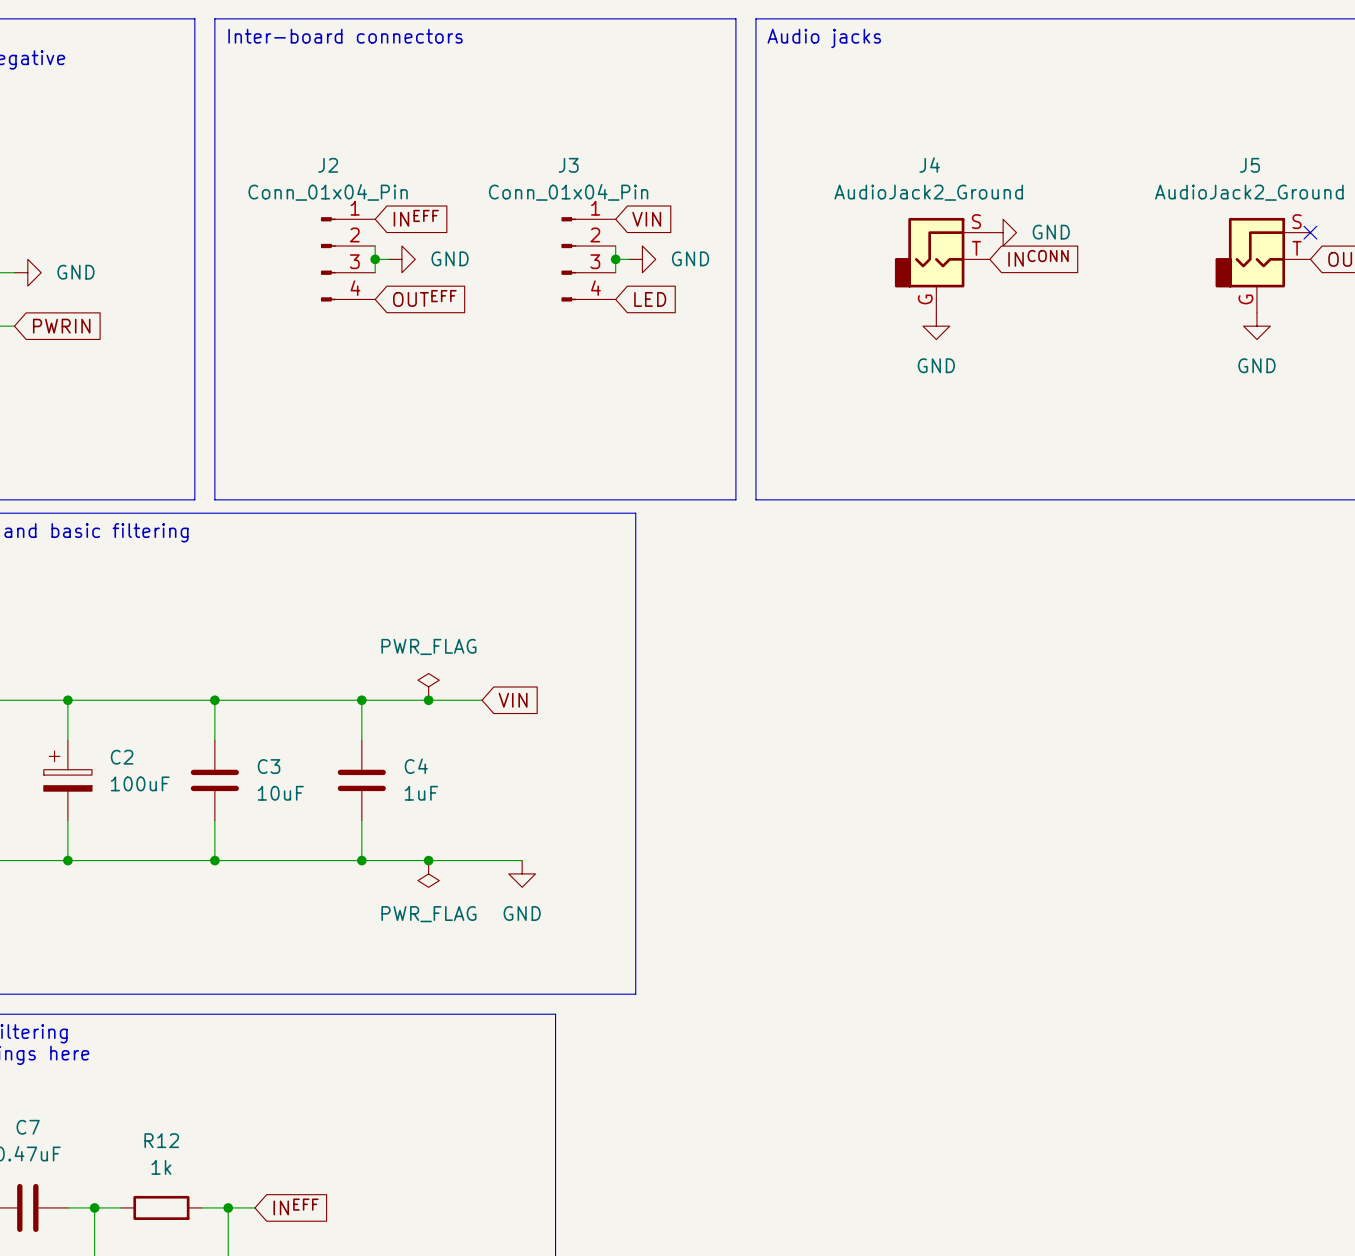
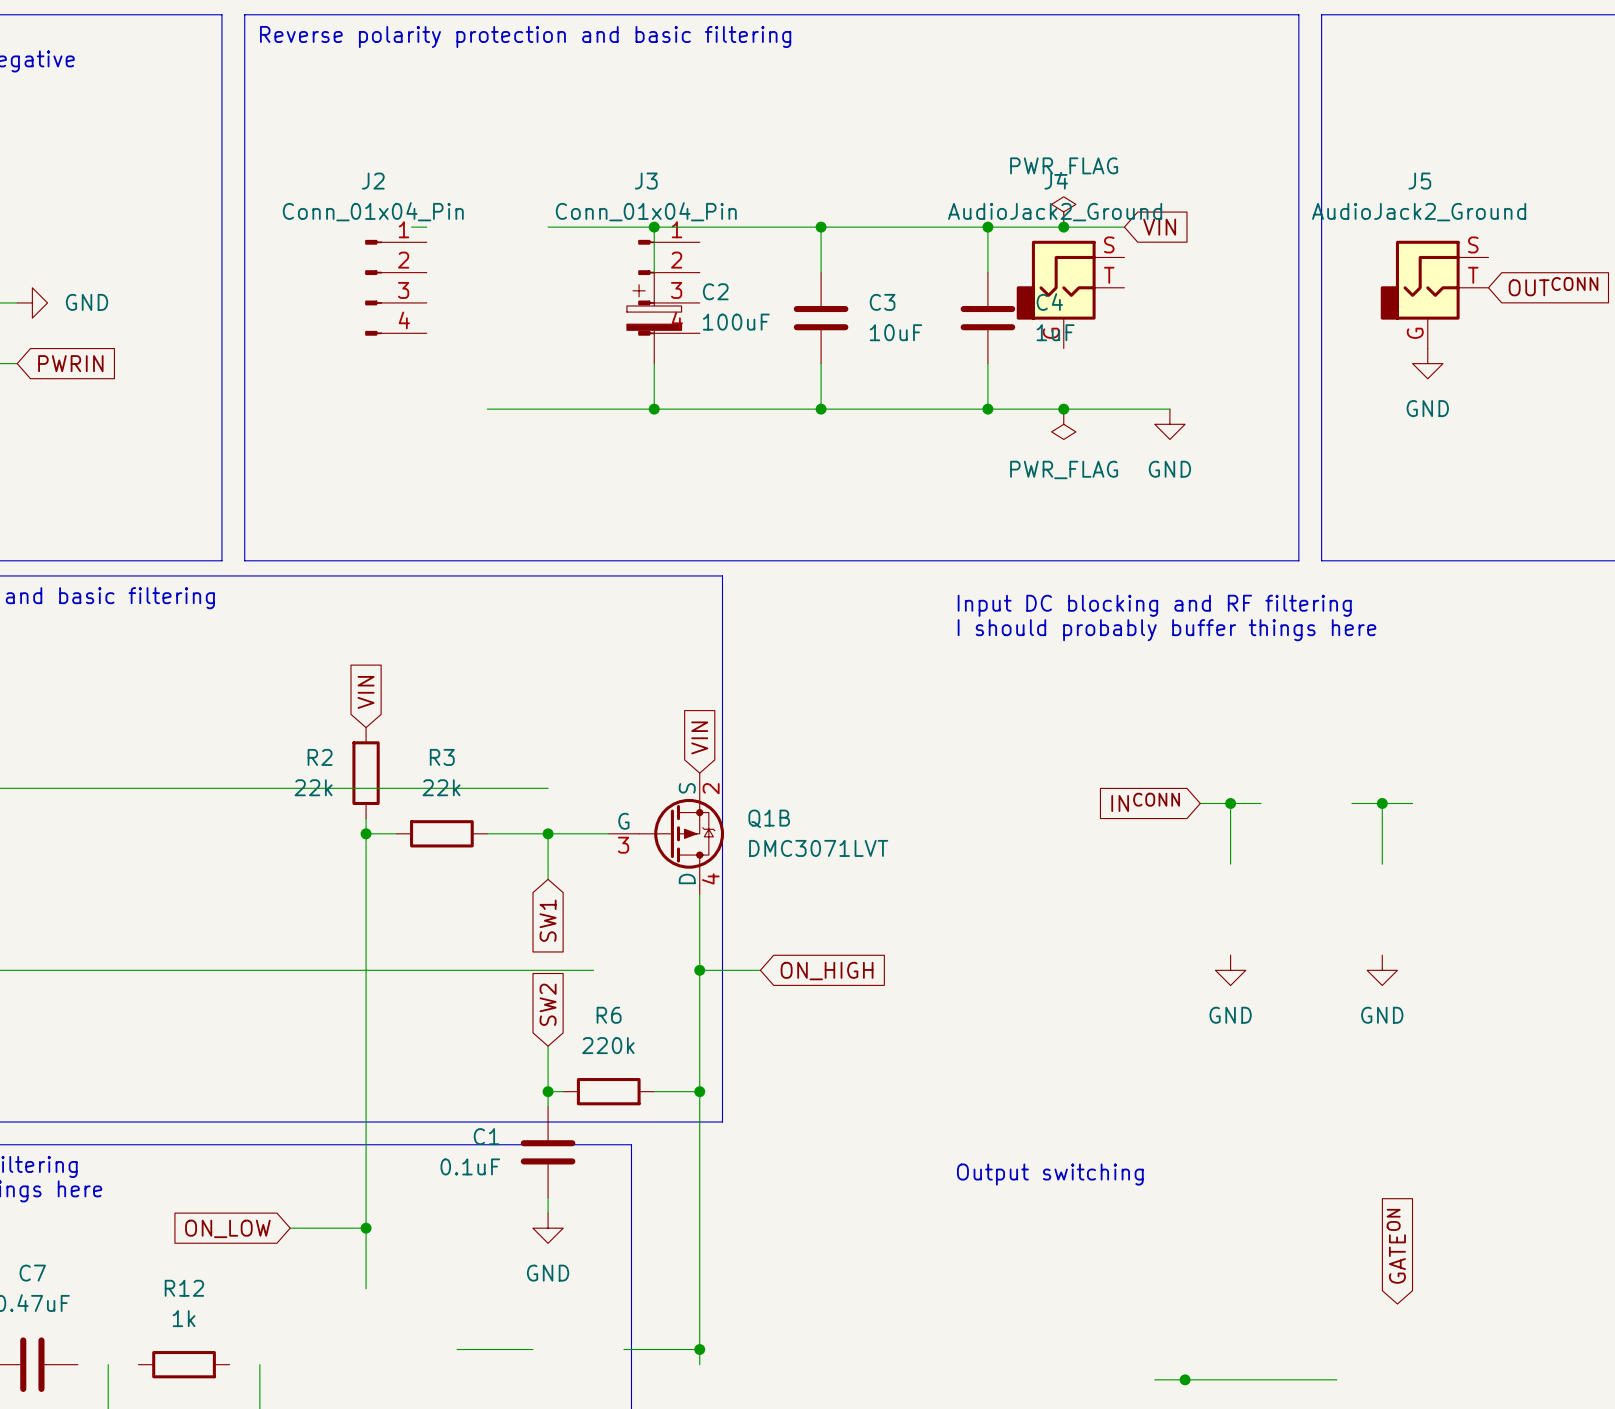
line: (735, 18) (735, 499) -> (836, 14) (859, 14)
line: (755, 18) (755, 499) -> (836, 560) (859, 560)
line: (1143, 18) (1163, 18) -> (1298, 14) (1298, 560)
text: Inter-board connectors (345, 36) -> Reverse polarity protection and basic filtering (525, 36)
text: Audio jacks (824, 38) -> none
power symbol: none -> PWR_FLAG (1063, 211)
wire: none -> (548, 227) (1124, 227)
wire: none -> (654, 227) (654, 272)
junction: none -> (654, 227)
wire: none -> (821, 227) (821, 272)
junction: none -> (821, 227)
wire: none -> (987, 227) (987, 272)
junction: none -> (987, 227)
junction: none -> (1063, 227)
global label: none -> VIN (1159, 227)
global label: INEFF (416, 218) -> none
global label: VIN (646, 219) -> none
power symbol: GND (1003, 232) -> none
no-connect mark: (1310, 232) -> none
wire: (375, 246) (375, 272) -> none
wire: (615, 246) (615, 272) -> none
global label: INCONN (1038, 258) -> none
wire: (375, 259) (388, 259) -> (411, 227) (426, 227)
junction: (375, 259) -> none
power symbol: GND (401, 259) -> none
wire: (615, 259) (629, 259) -> none
junction: (615, 259) -> none
power symbol: GND (642, 259) -> none
global label: OUTEFF (424, 298) -> none
global label: LED (650, 299) -> none
wire: none -> (654, 363) (654, 409)
wire: none -> (821, 363) (821, 409)
wire: none -> (987, 363) (987, 409)
power symbol: GND (936, 326) -> none
wire: none -> (487, 409) (1169, 409)
junction: none -> (654, 409)
junction: none -> (821, 409)
junction: none -> (987, 409)
junction: none -> (1063, 409)
power symbol: none -> PWR_FLAG (1063, 424)
power symbol: none -> GND (1169, 424)
line: (1143, 499) (1163, 499) -> (1321, 14) (1321, 560)
text: none -> Input DC blocking and RF filtering (1154, 605)
text: none -> I should probably buffer things here (1166, 630)
global label: none -> VIN (366, 692)
global label: none -> VIN (699, 737)
R2: none -> 22k (366, 773)
power symbol: PWR_FLAG (428, 686) -> none
wire: (67, 700) (67, 740) -> none
junction: (67, 700) -> none
wire: (214, 700) (214, 740) -> none
junction: (214, 700) -> none
wire: (361, 700) (361, 740) -> (548, 833) (548, 879)
junction position: (361, 700) -> (366, 833)
junction: (428, 700) -> none
global label: VIN (513, 700) -> none
global label: none -> INCONN (1145, 802)
wire: none -> (1200, 803) (1260, 803)
wire: none -> (1230, 803) (1230, 864)
junction: none -> (1230, 803)
wire: none -> (1351, 803) (1412, 803)
wire: none -> (1382, 803) (1382, 864)
junction: none -> (1382, 803)
wire: none -> (366, 818) (366, 1288)
wire: none -> (366, 833) (396, 833)
R3: none -> 22k (441, 833)
wire: none -> (487, 833) (608, 833)
junction: none -> (548, 833)
Q1B: none -> DMC3071LVT (666, 833)
C2 position: (67, 780) -> (654, 318)
C3 position: (214, 780) -> (821, 318)
C4 position: (361, 780) -> (987, 318)
wire: none -> (699, 894) (699, 1364)
global label: none -> SW1 (548, 920)
wire: (67, 820) (67, 860) -> none
wire: (214, 820) (214, 860) -> none
wire: (361, 820) (361, 860) -> none
junction: (67, 860) -> none
junction: (214, 860) -> none
junction: (361, 860) -> none
junction: (428, 860) -> none
wire: none -> (699, 970) (760, 970)
junction: none -> (699, 970)
power symbol: none -> GND (1230, 970)
power symbol: none -> GND (1382, 970)
global label: none -> ON_HIGH (827, 971)
power symbol: PWR_FLAG (428, 873) -> none
power symbol: GND (522, 873) -> none
global label: none -> SW2 (548, 1004)
wire: none -> (548, 1046) (548, 1106)
wire: none -> (548, 1091) (563, 1091)
junction: none -> (548, 1091)
R6: none -> 220k (608, 1091)
wire: none -> (654, 1091) (699, 1091)
junction: none -> (699, 1091)
C1: none -> 0.1uF (548, 1152)
text: none -> Output switching (1050, 1174)
wire: none -> (548, 1197) (548, 1213)
wire: none -> (290, 1228) (366, 1228)
junction: none -> (366, 1228)
power symbol: none -> GND (548, 1228)
global label: none -> ON_LOW (227, 1228)
global label: none -> GATEON (1396, 1246)
wire: none -> (457, 1349) (532, 1349)
wire: none -> (623, 1349) (699, 1349)
junction: none -> (699, 1349)
global label: INEFF (296, 1206) -> none
wire: (67, 1207) (121, 1207) -> none
junction: (94, 1207) -> none
wire: (201, 1207) (254, 1207) -> none
junction: (228, 1207) -> none
wire: none -> (1154, 1379) (1336, 1379)
junction: none -> (1185, 1379)

